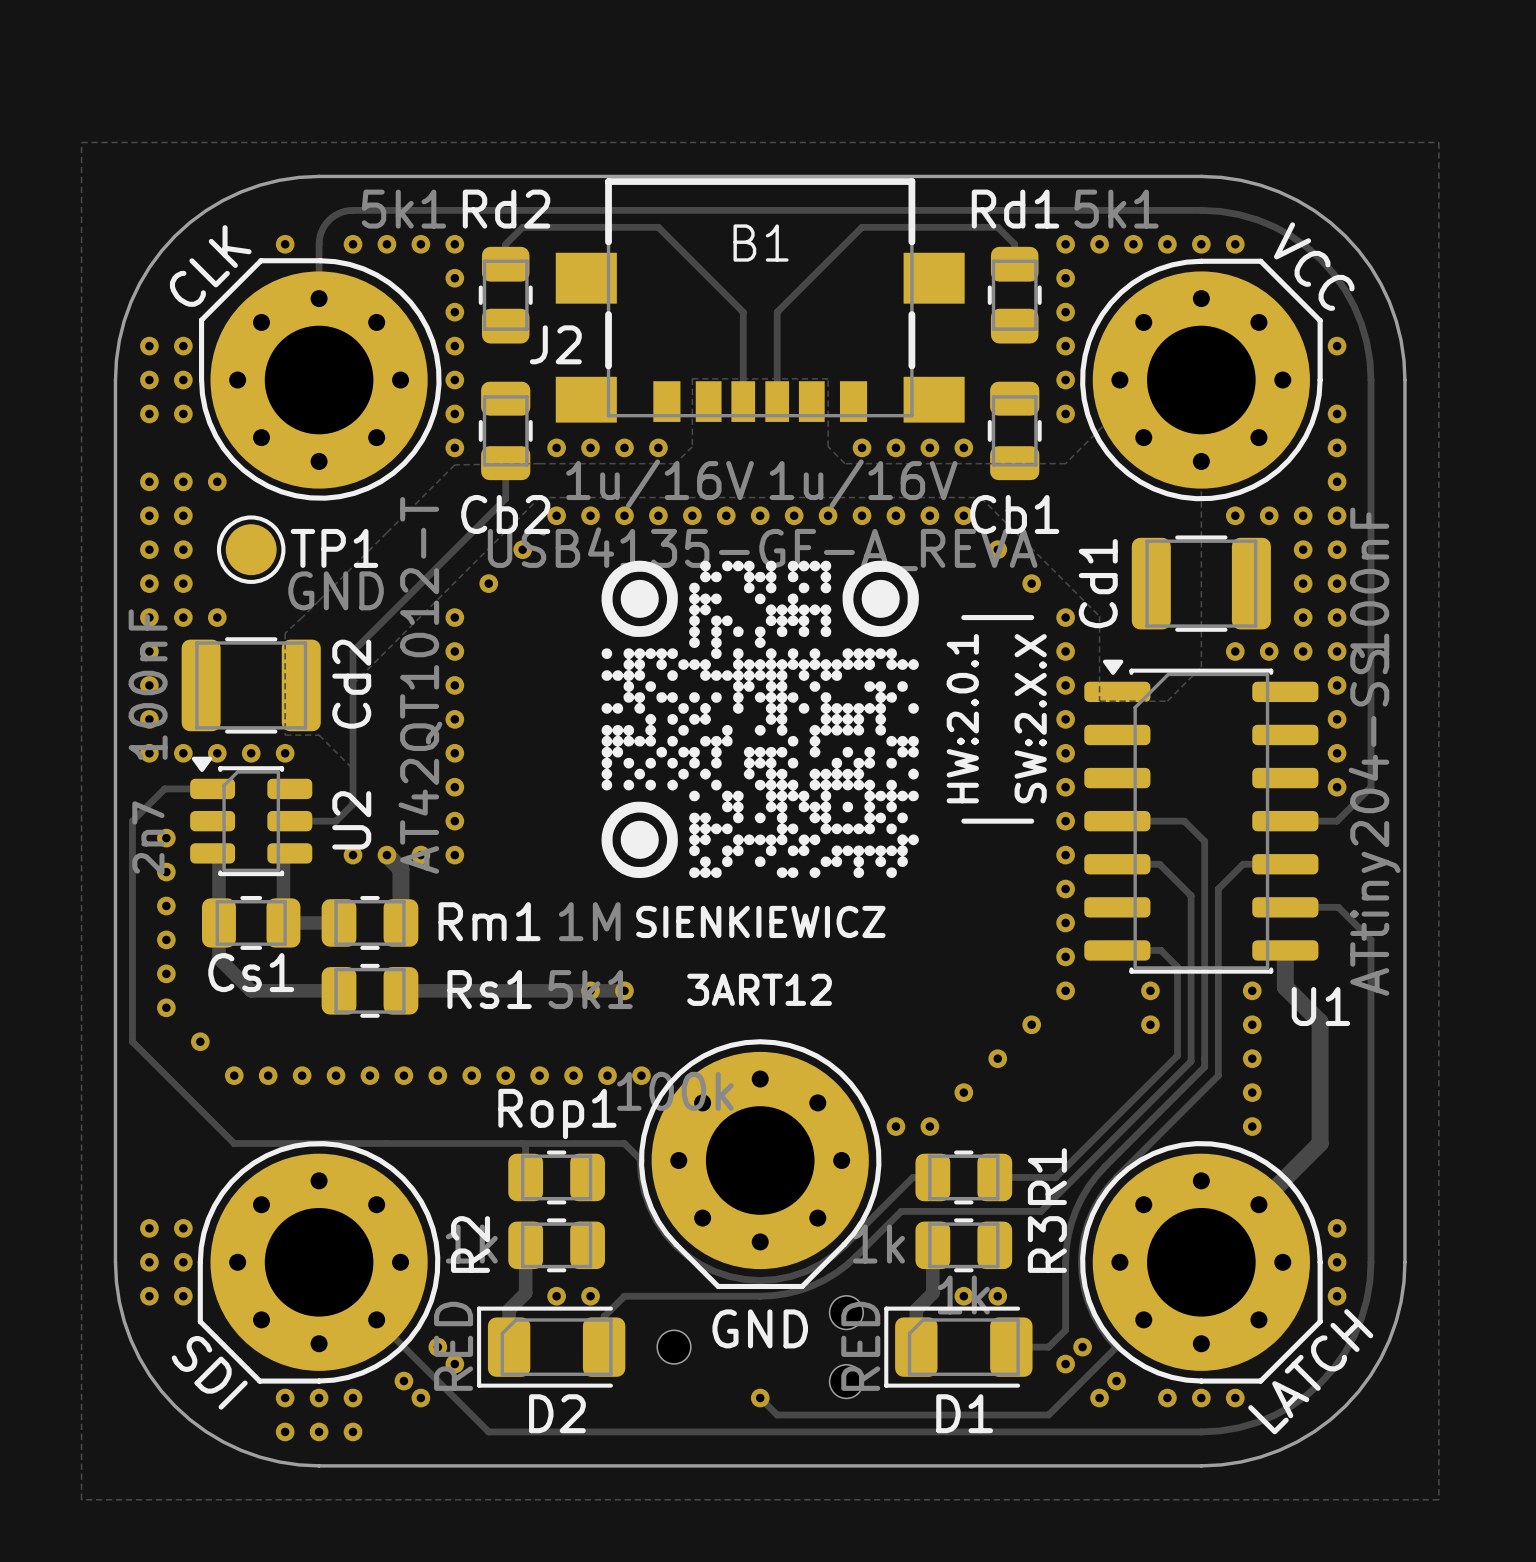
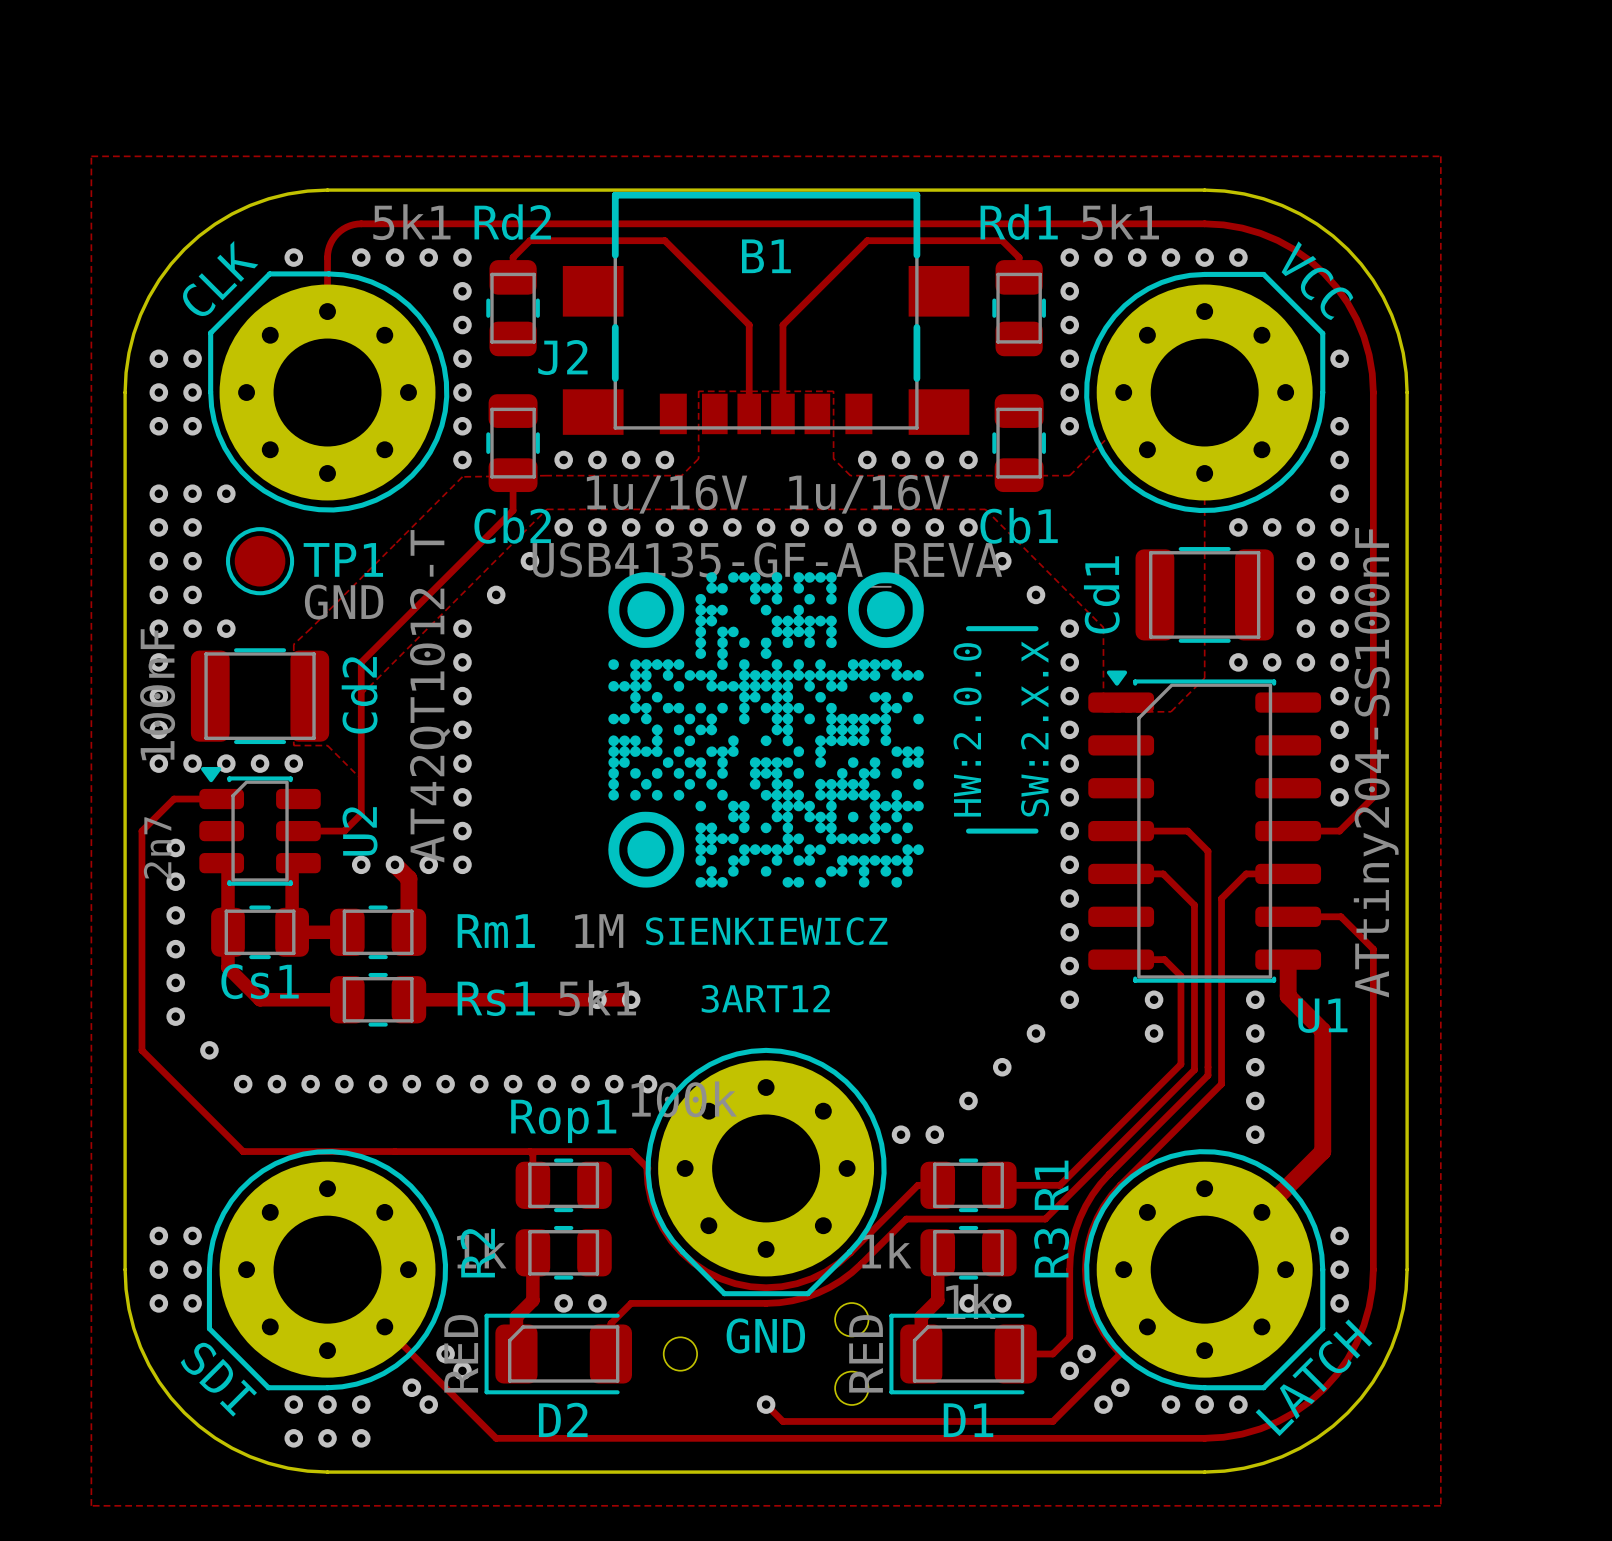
text: HW:2.0.1 (962, 718) -> HW:2.0.0 (967, 729)

